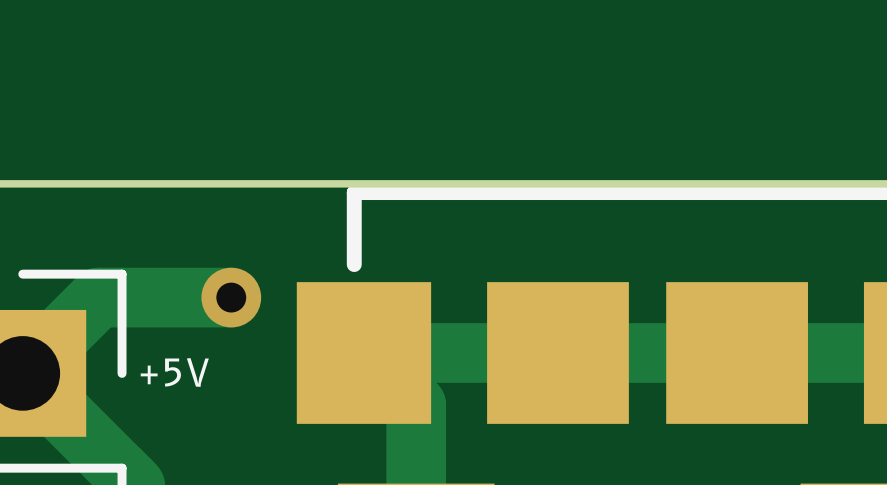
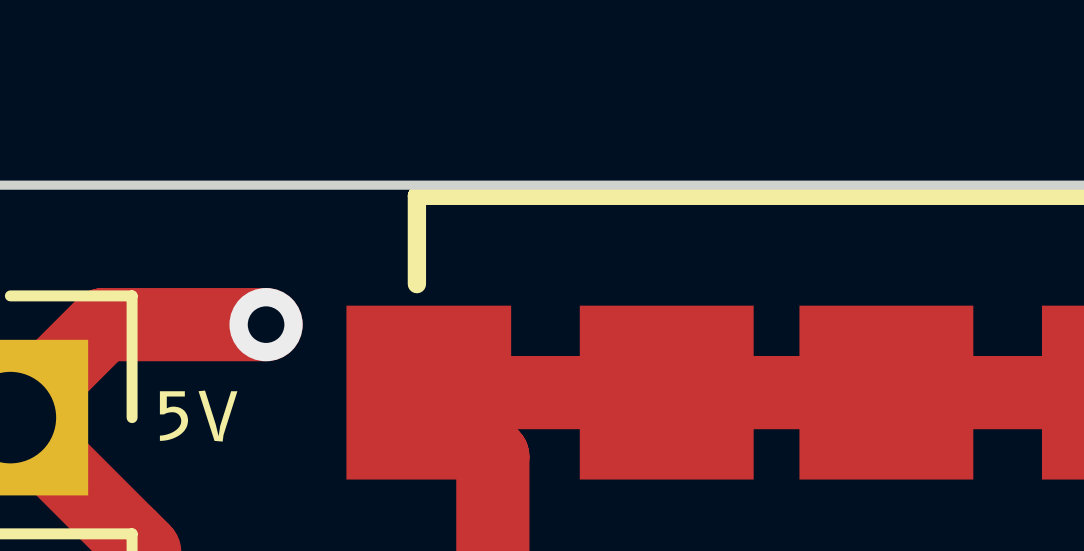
text: +5V (174, 372) -> 5V (198, 416)

